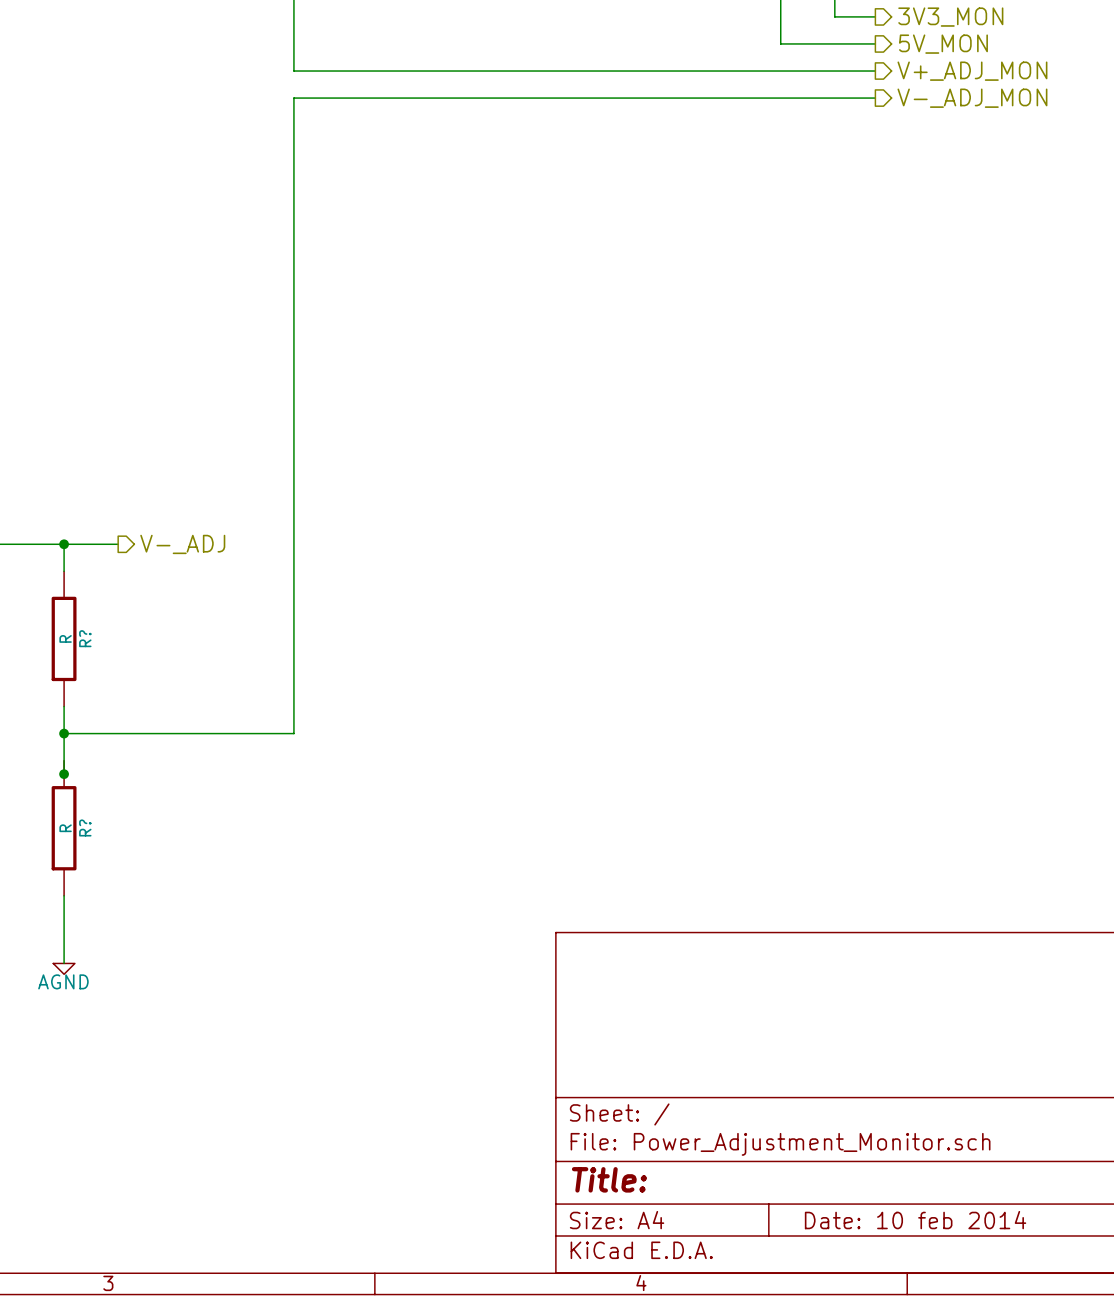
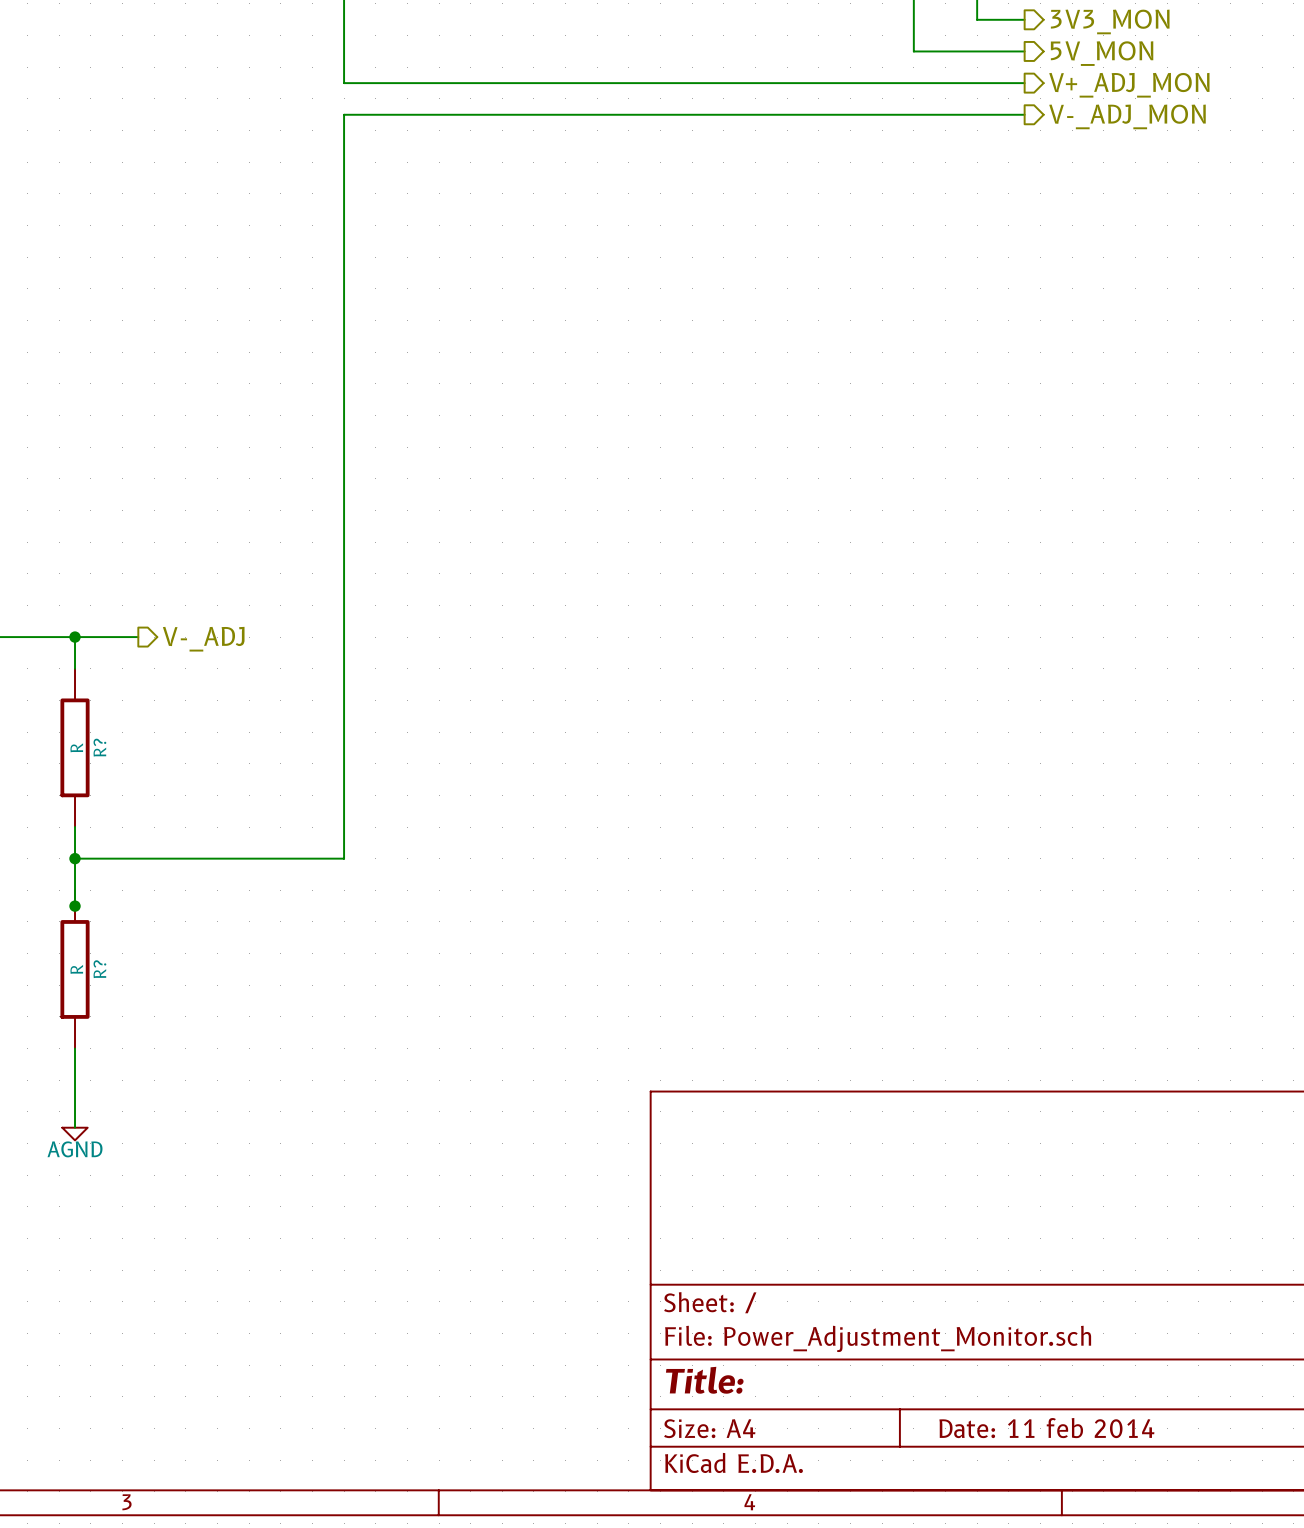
title block: Date: 10 feb 2014 (915, 1220) -> Date: 11 feb 2014 (1046, 1428)

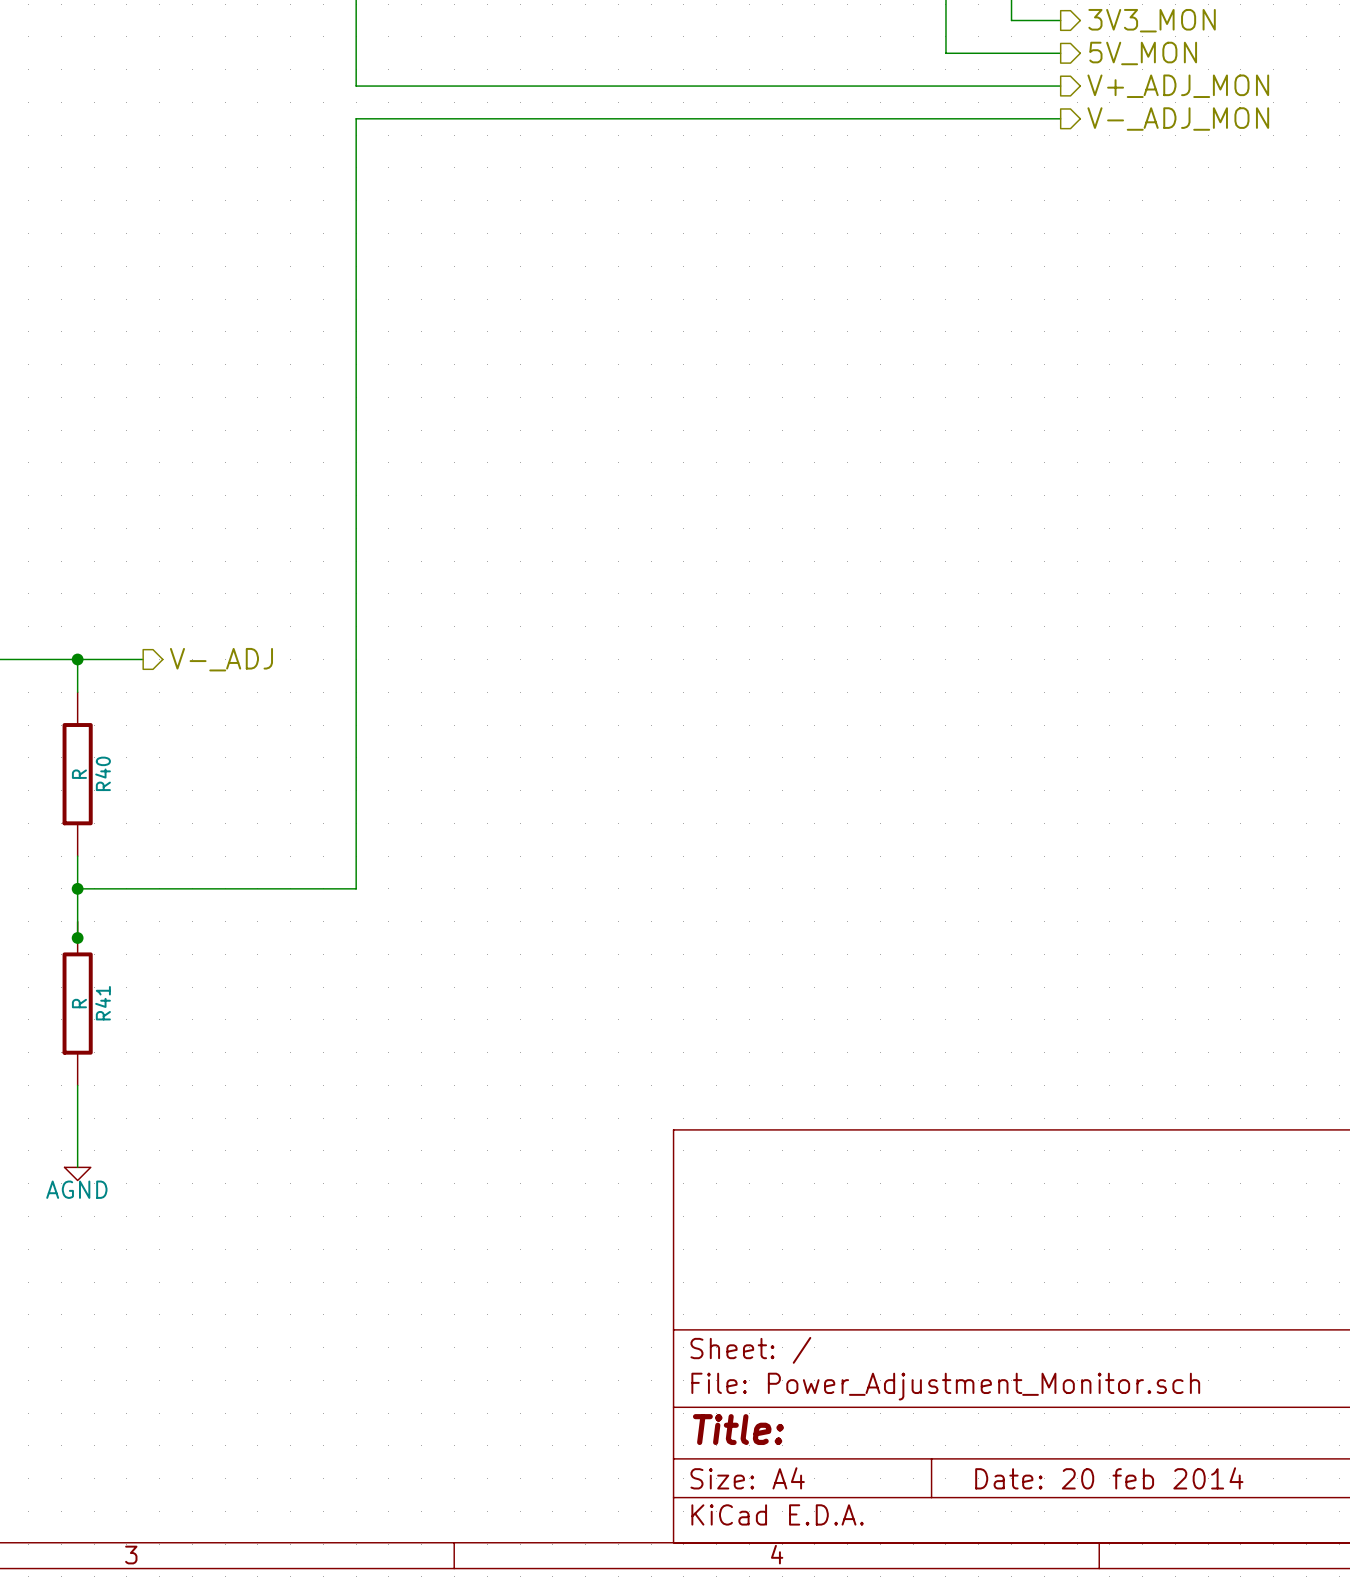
R? name: R? (99, 747) -> R40 (103, 773)
R? name: R? (99, 969) -> R41 (103, 1003)
title block: Date: 11 feb 2014 (1046, 1428) -> Date: 20 feb 2014 (1109, 1478)

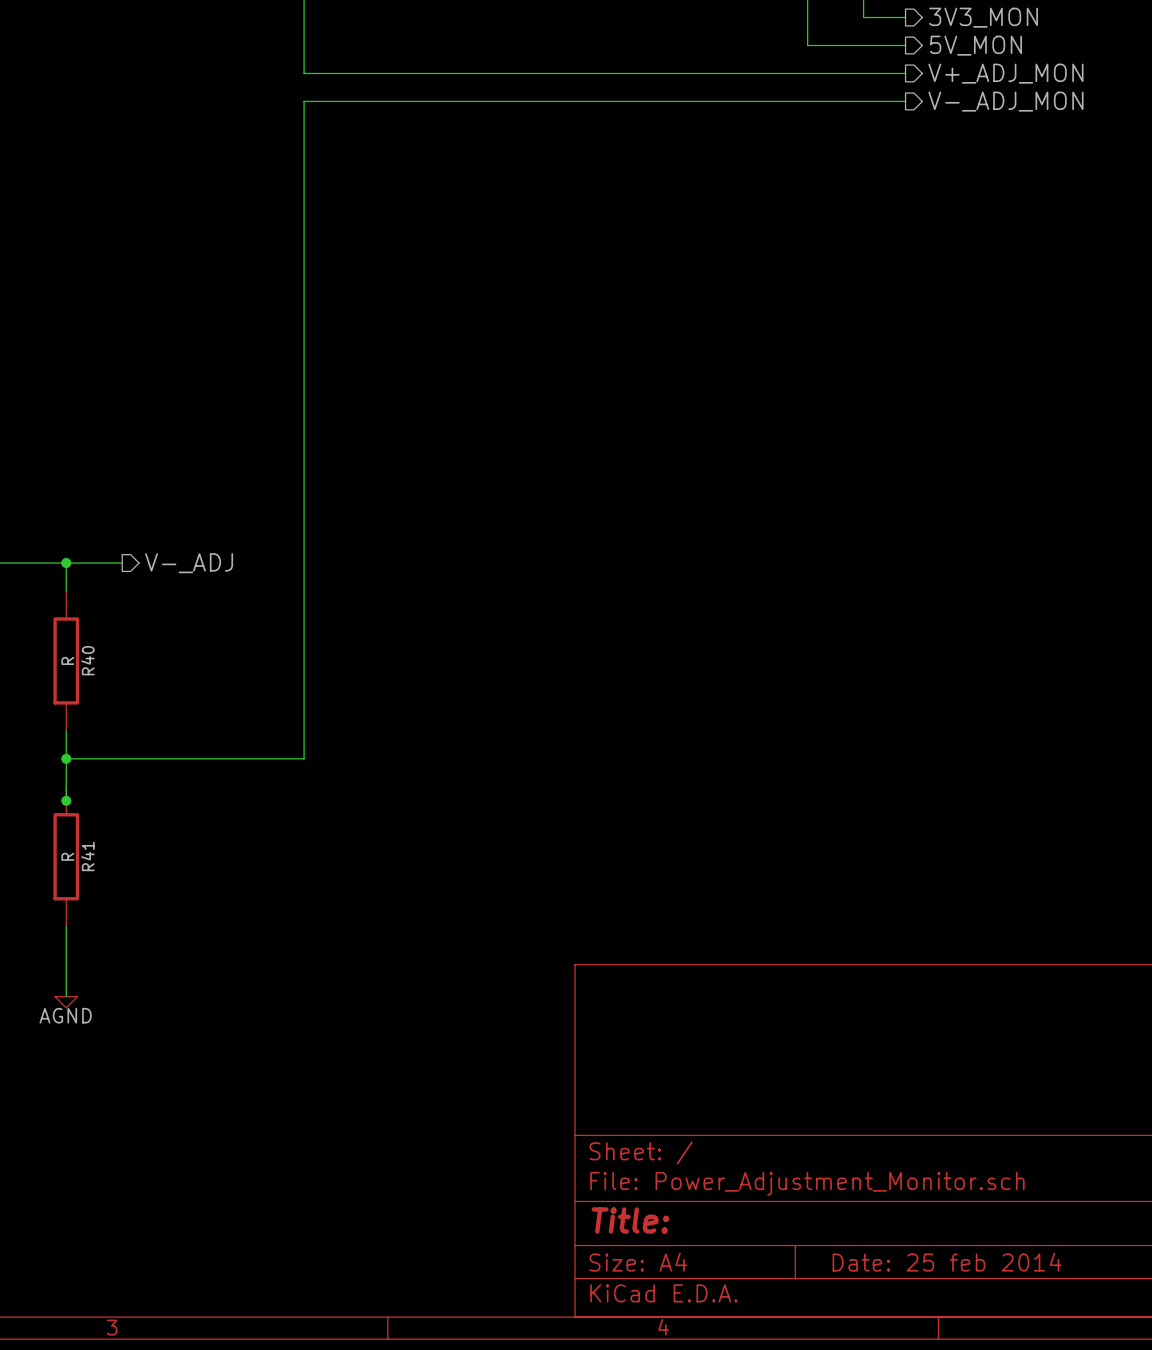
title block: Date: 20 feb 2014 (1109, 1478) -> Date: 25 feb 2014 (947, 1262)

